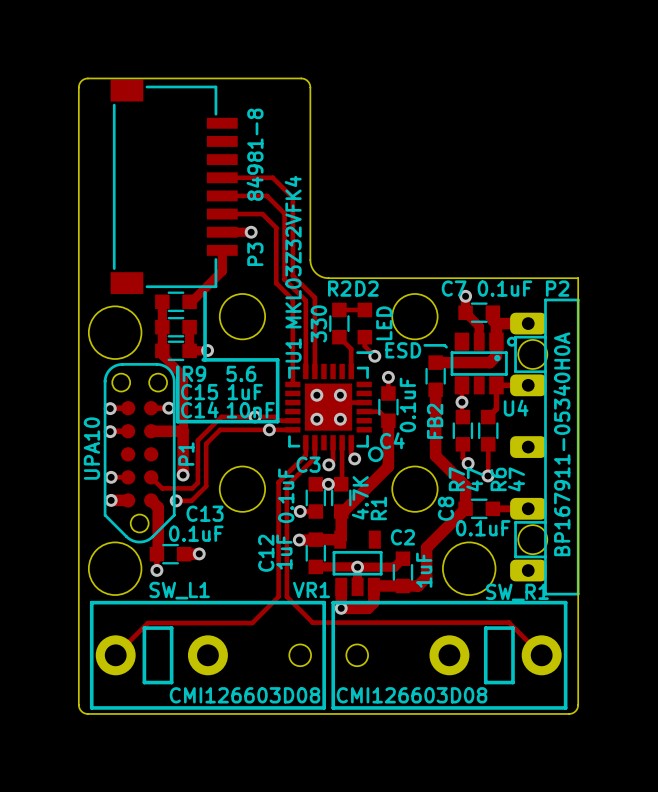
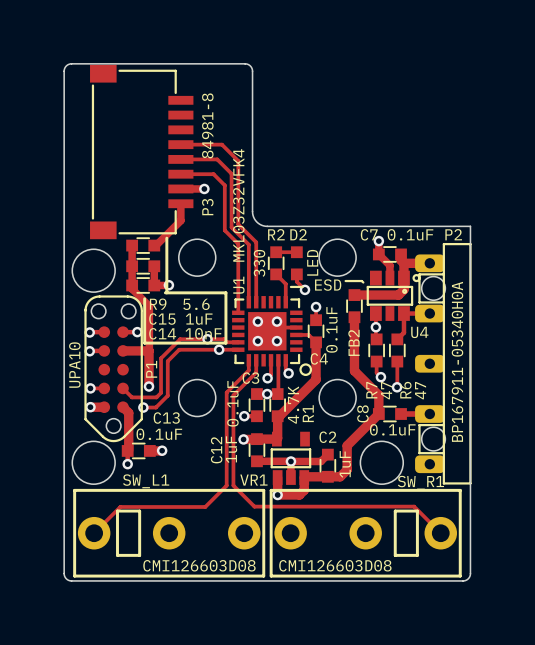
SW_L1 footprint: [89, 600, 326, 710] -> [73, 488, 266, 578]
SW_R1 footprint: [331, 600, 568, 710] -> [269, 488, 462, 578]

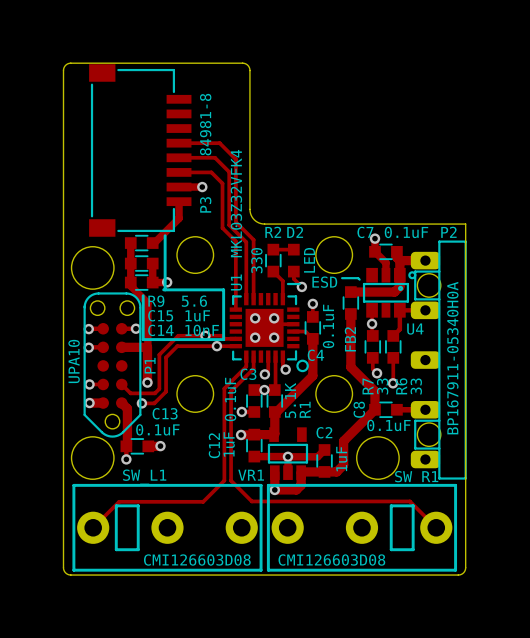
R7 value: 47 (386, 390) -> 33 (382, 386)
R6 value: 47 (420, 390) -> 33 (416, 386)
R1 value: 4.7K (293, 405) -> 5.1K (290, 400)

